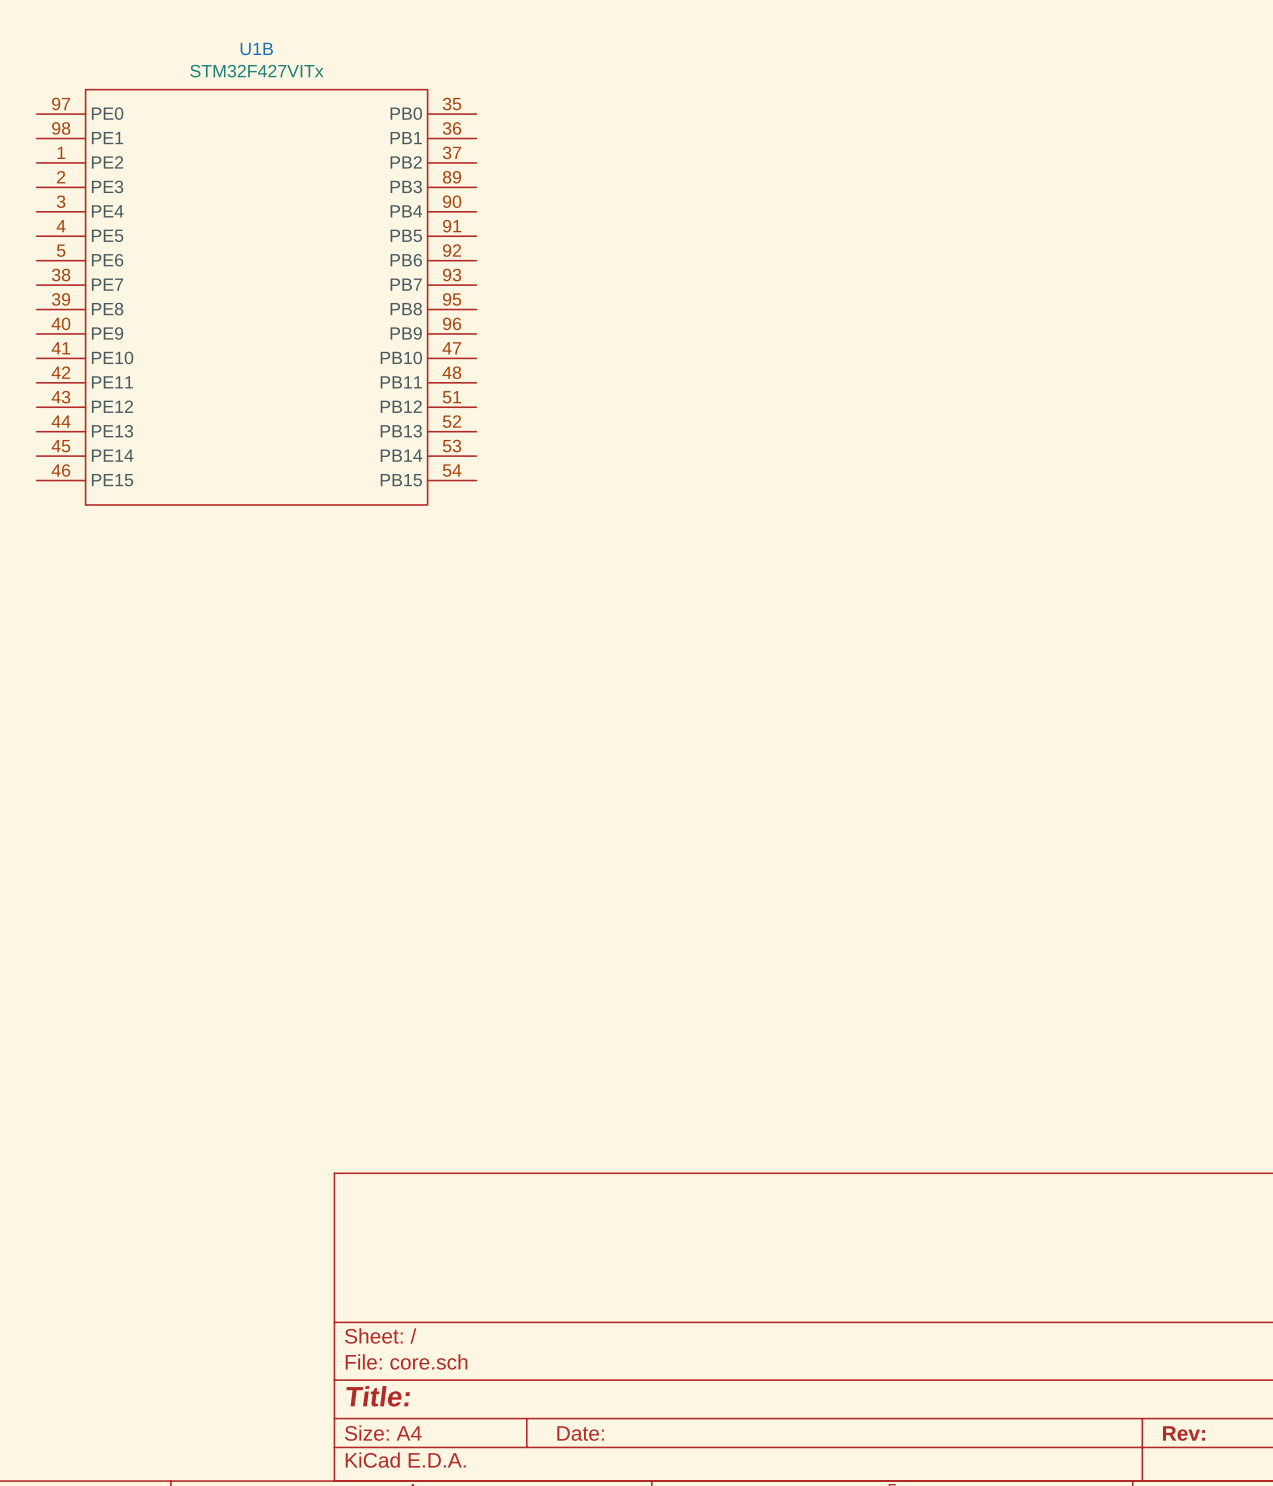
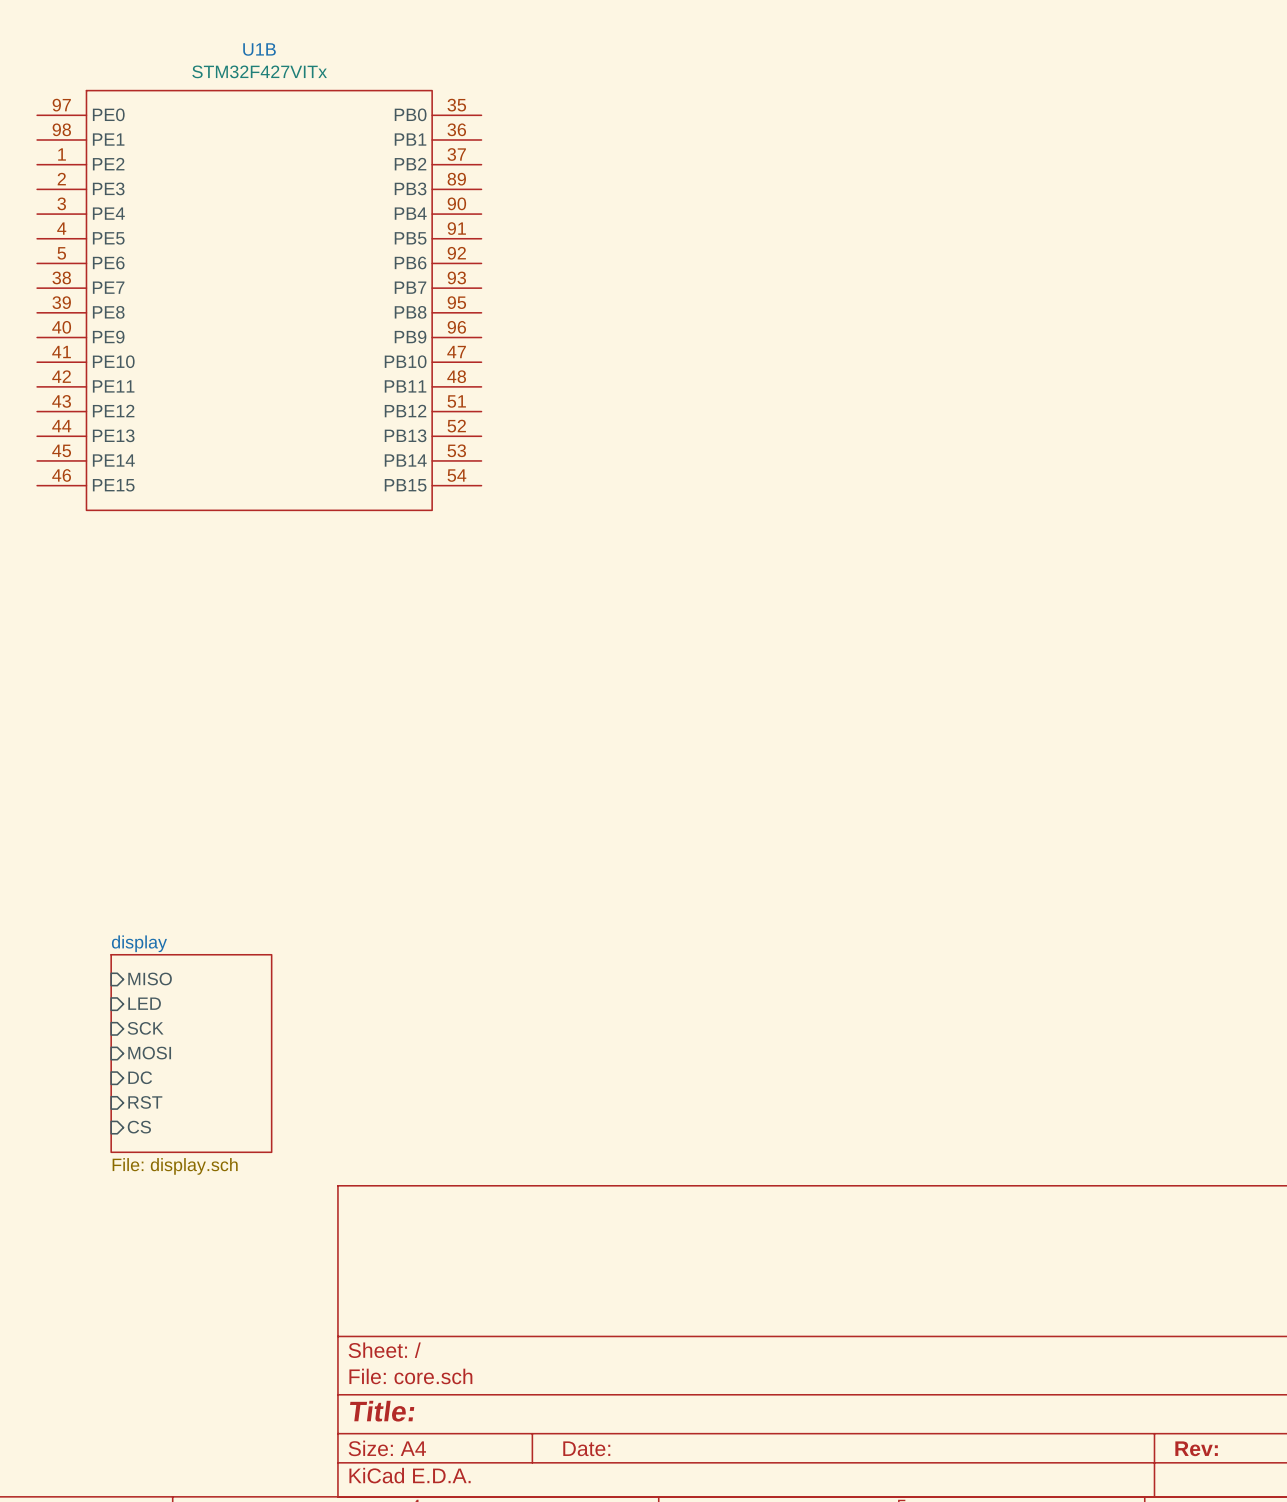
sheet pin: none -> MISO (150, 978)
sheet pin: none -> LED (144, 1003)
sheet pin: none -> SCK (145, 1028)
sheet pin: none -> MOSI (149, 1053)
sheet display: none -> File: display.sch (191, 1053)
sheet pin: none -> DC (140, 1077)
sheet pin: none -> RST (145, 1102)
sheet pin: none -> CS (139, 1127)

